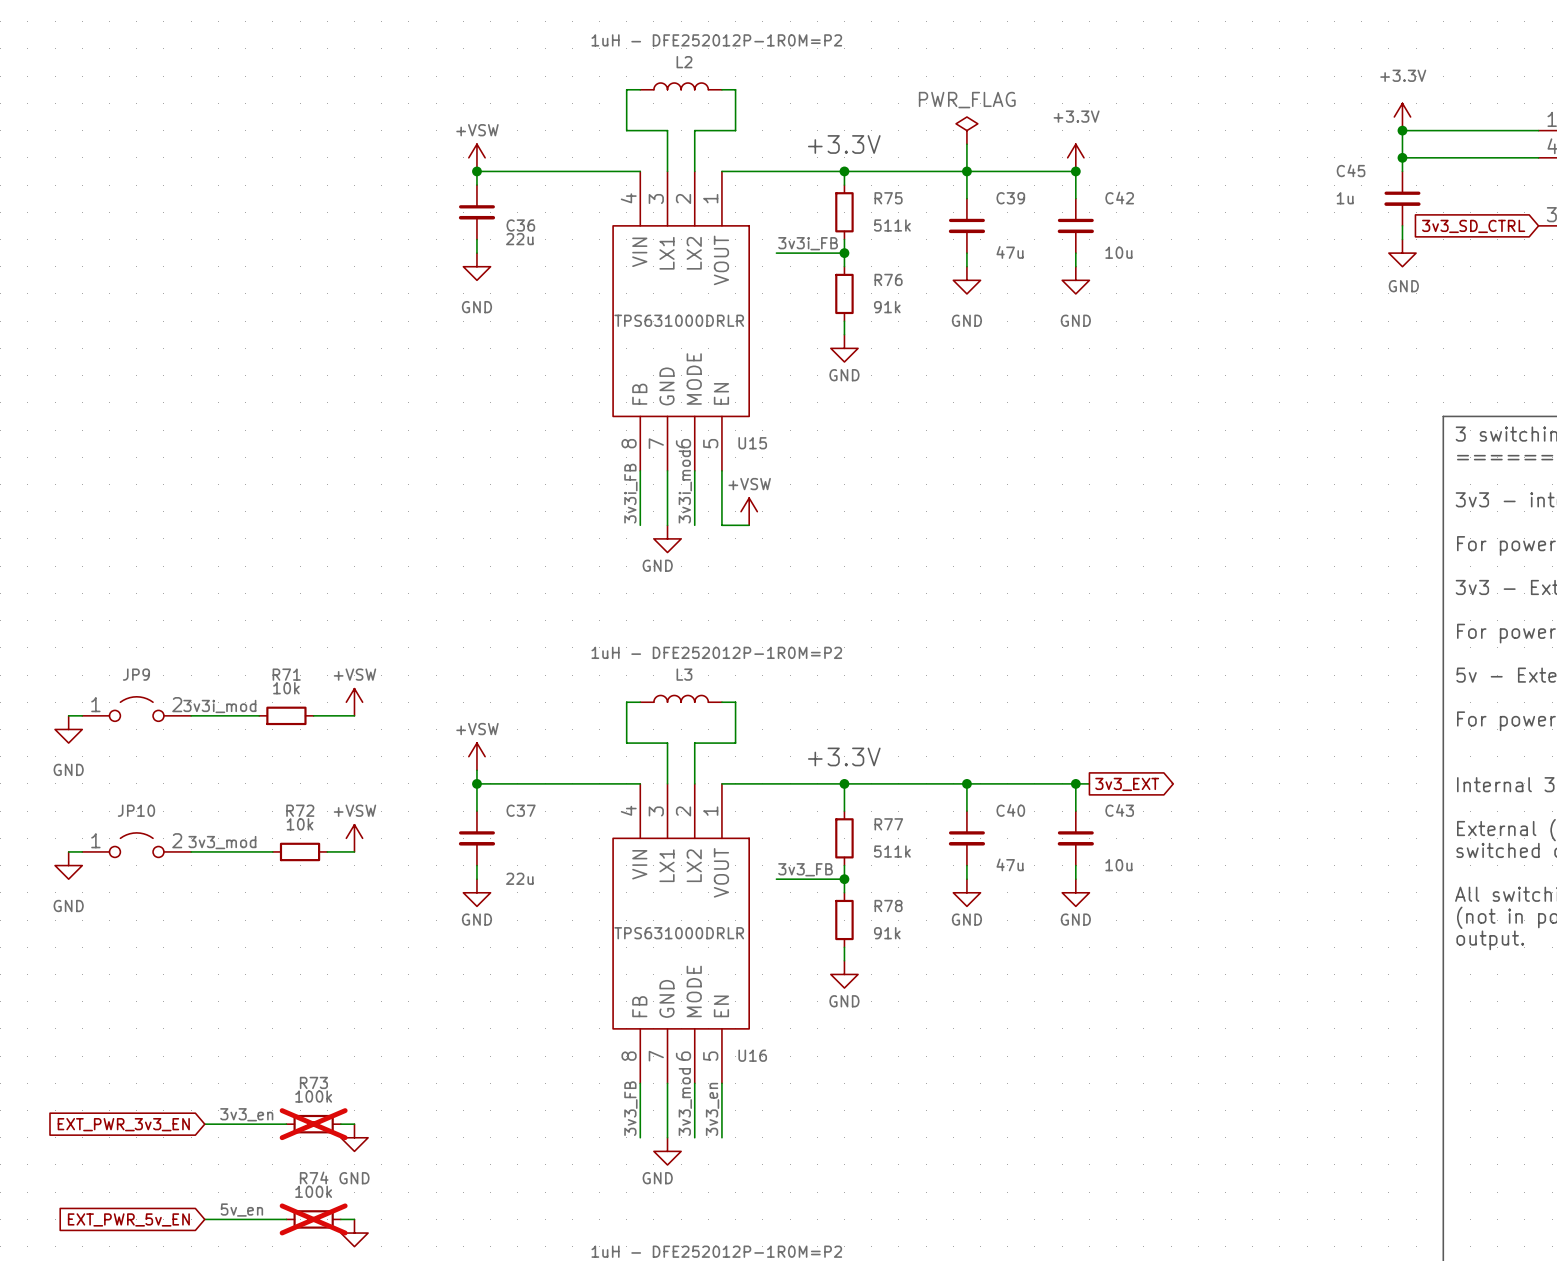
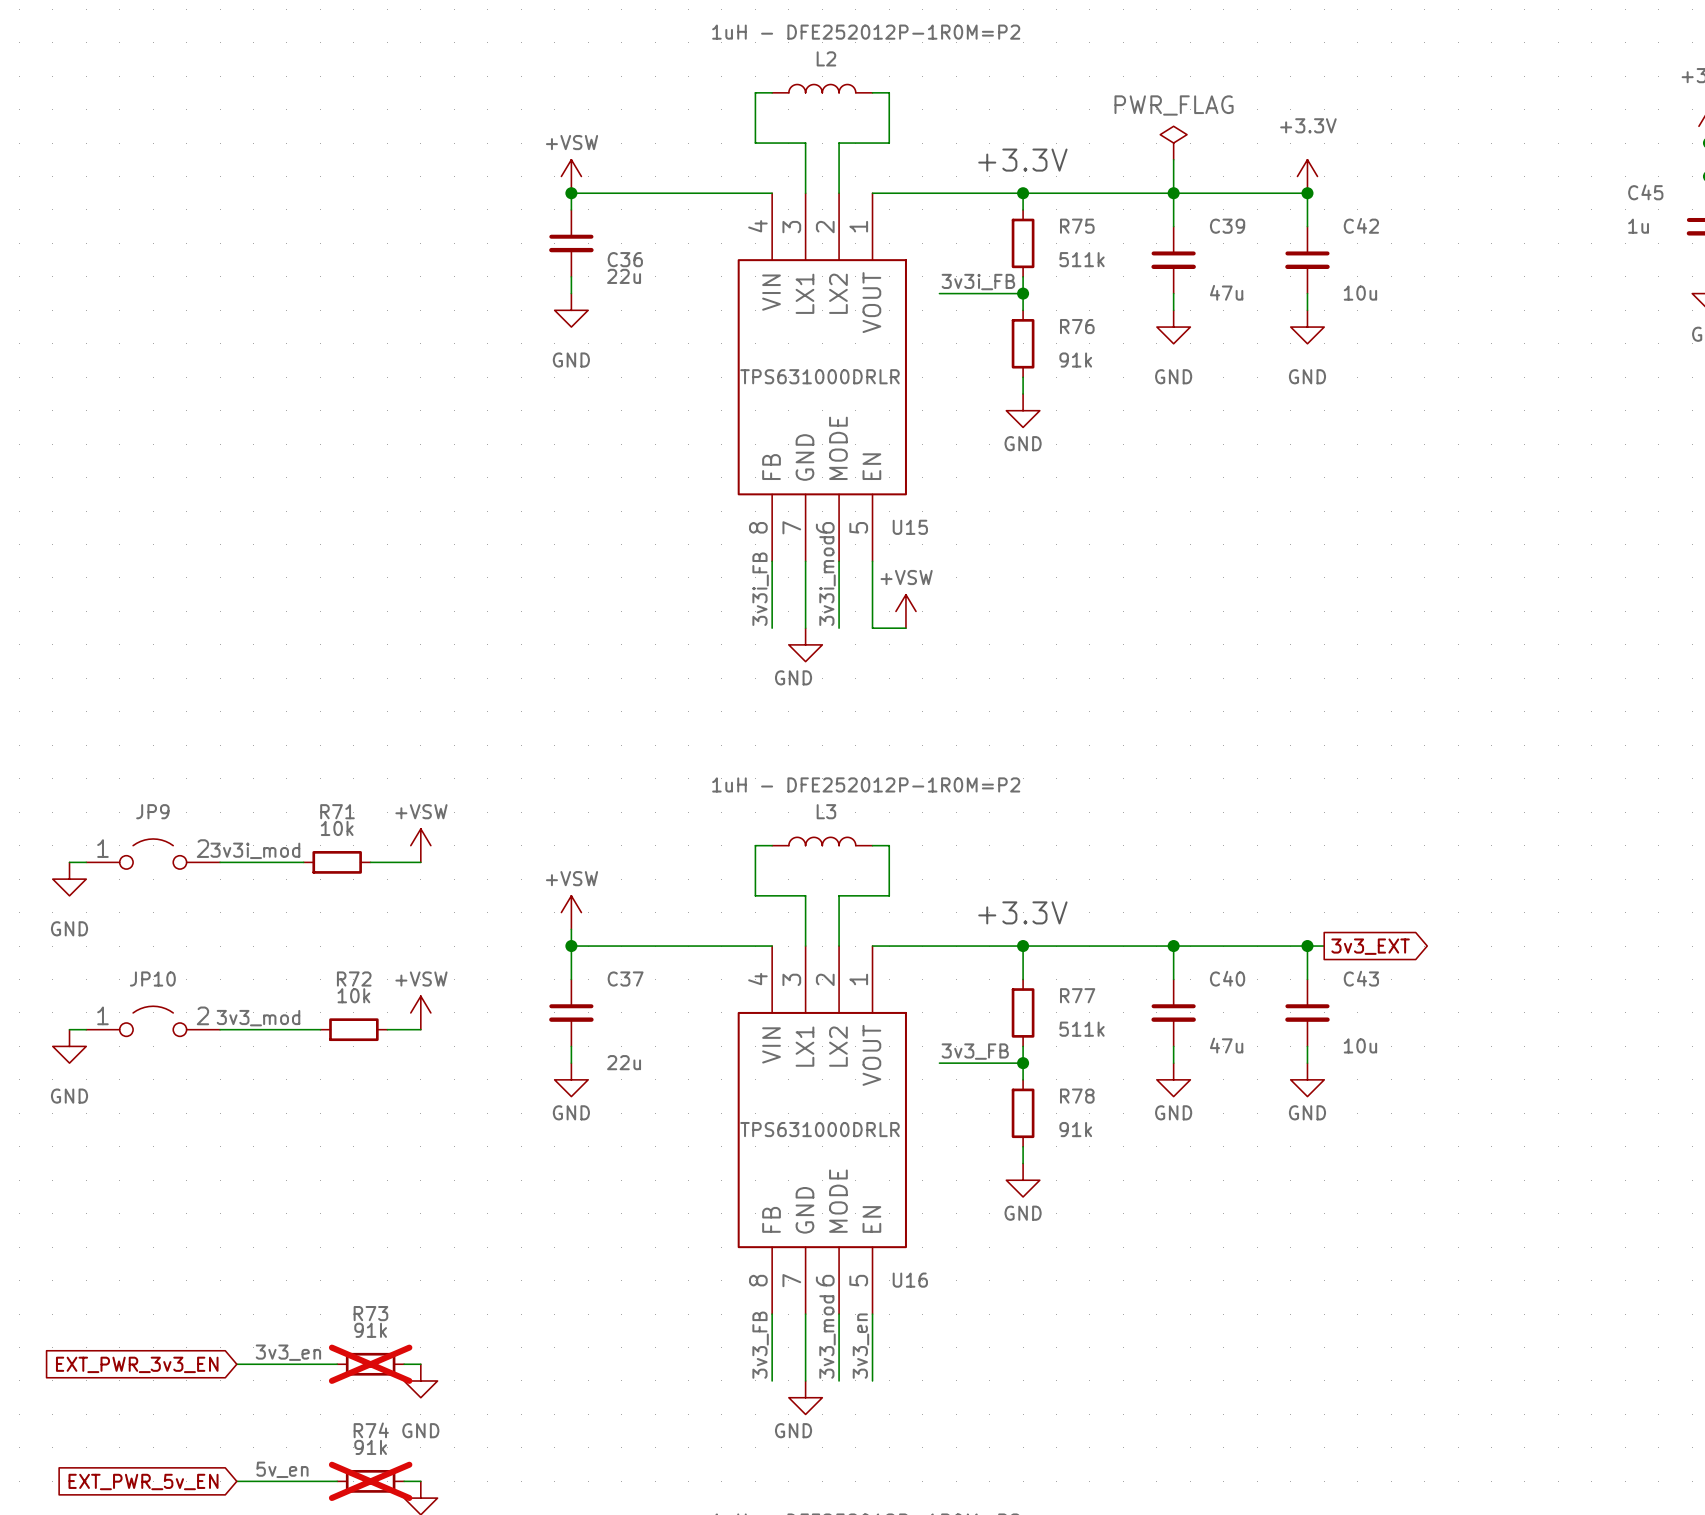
R73 value: 100k (313, 1096) -> 91k (370, 1330)
R74 value: 100k (313, 1191) -> 91k (370, 1447)

